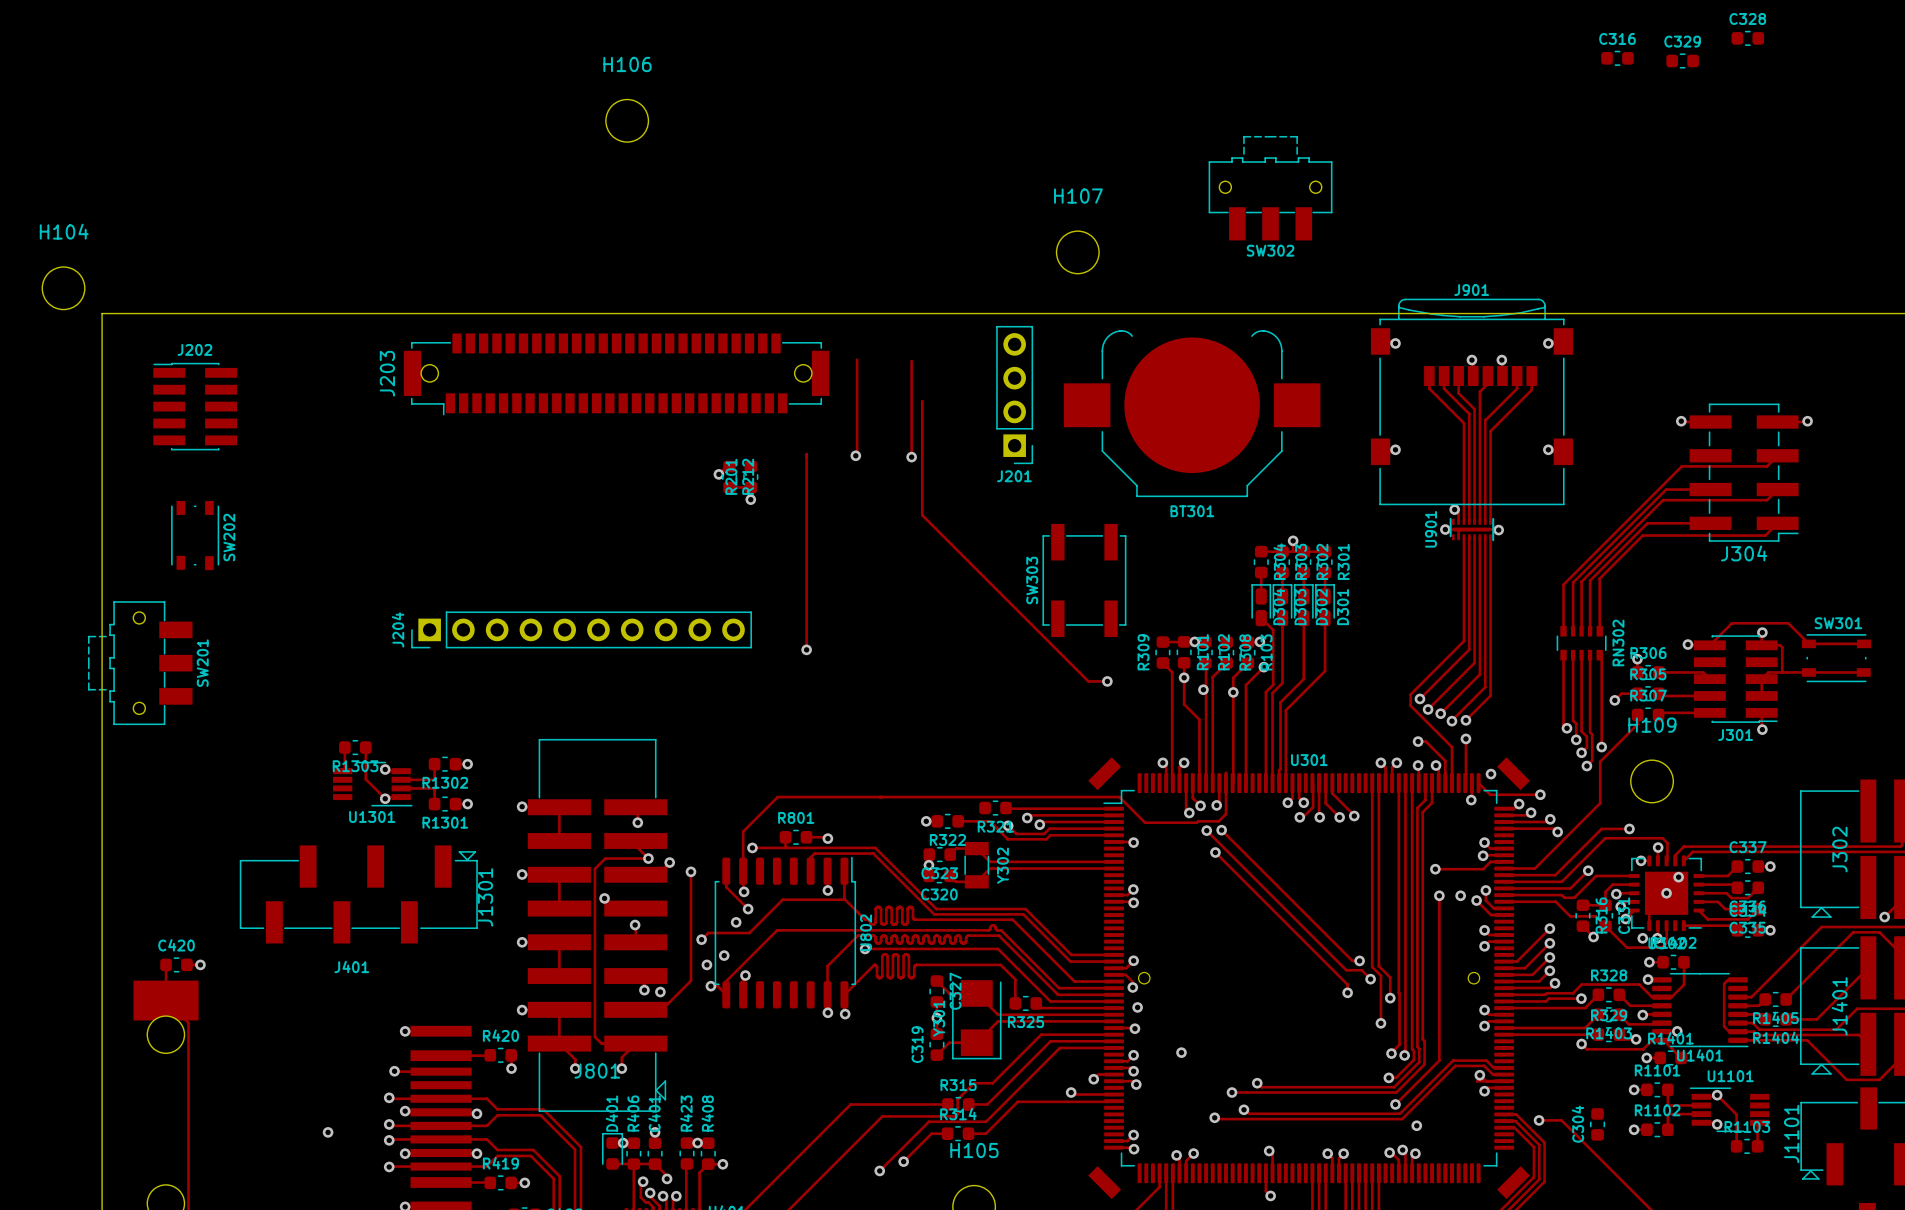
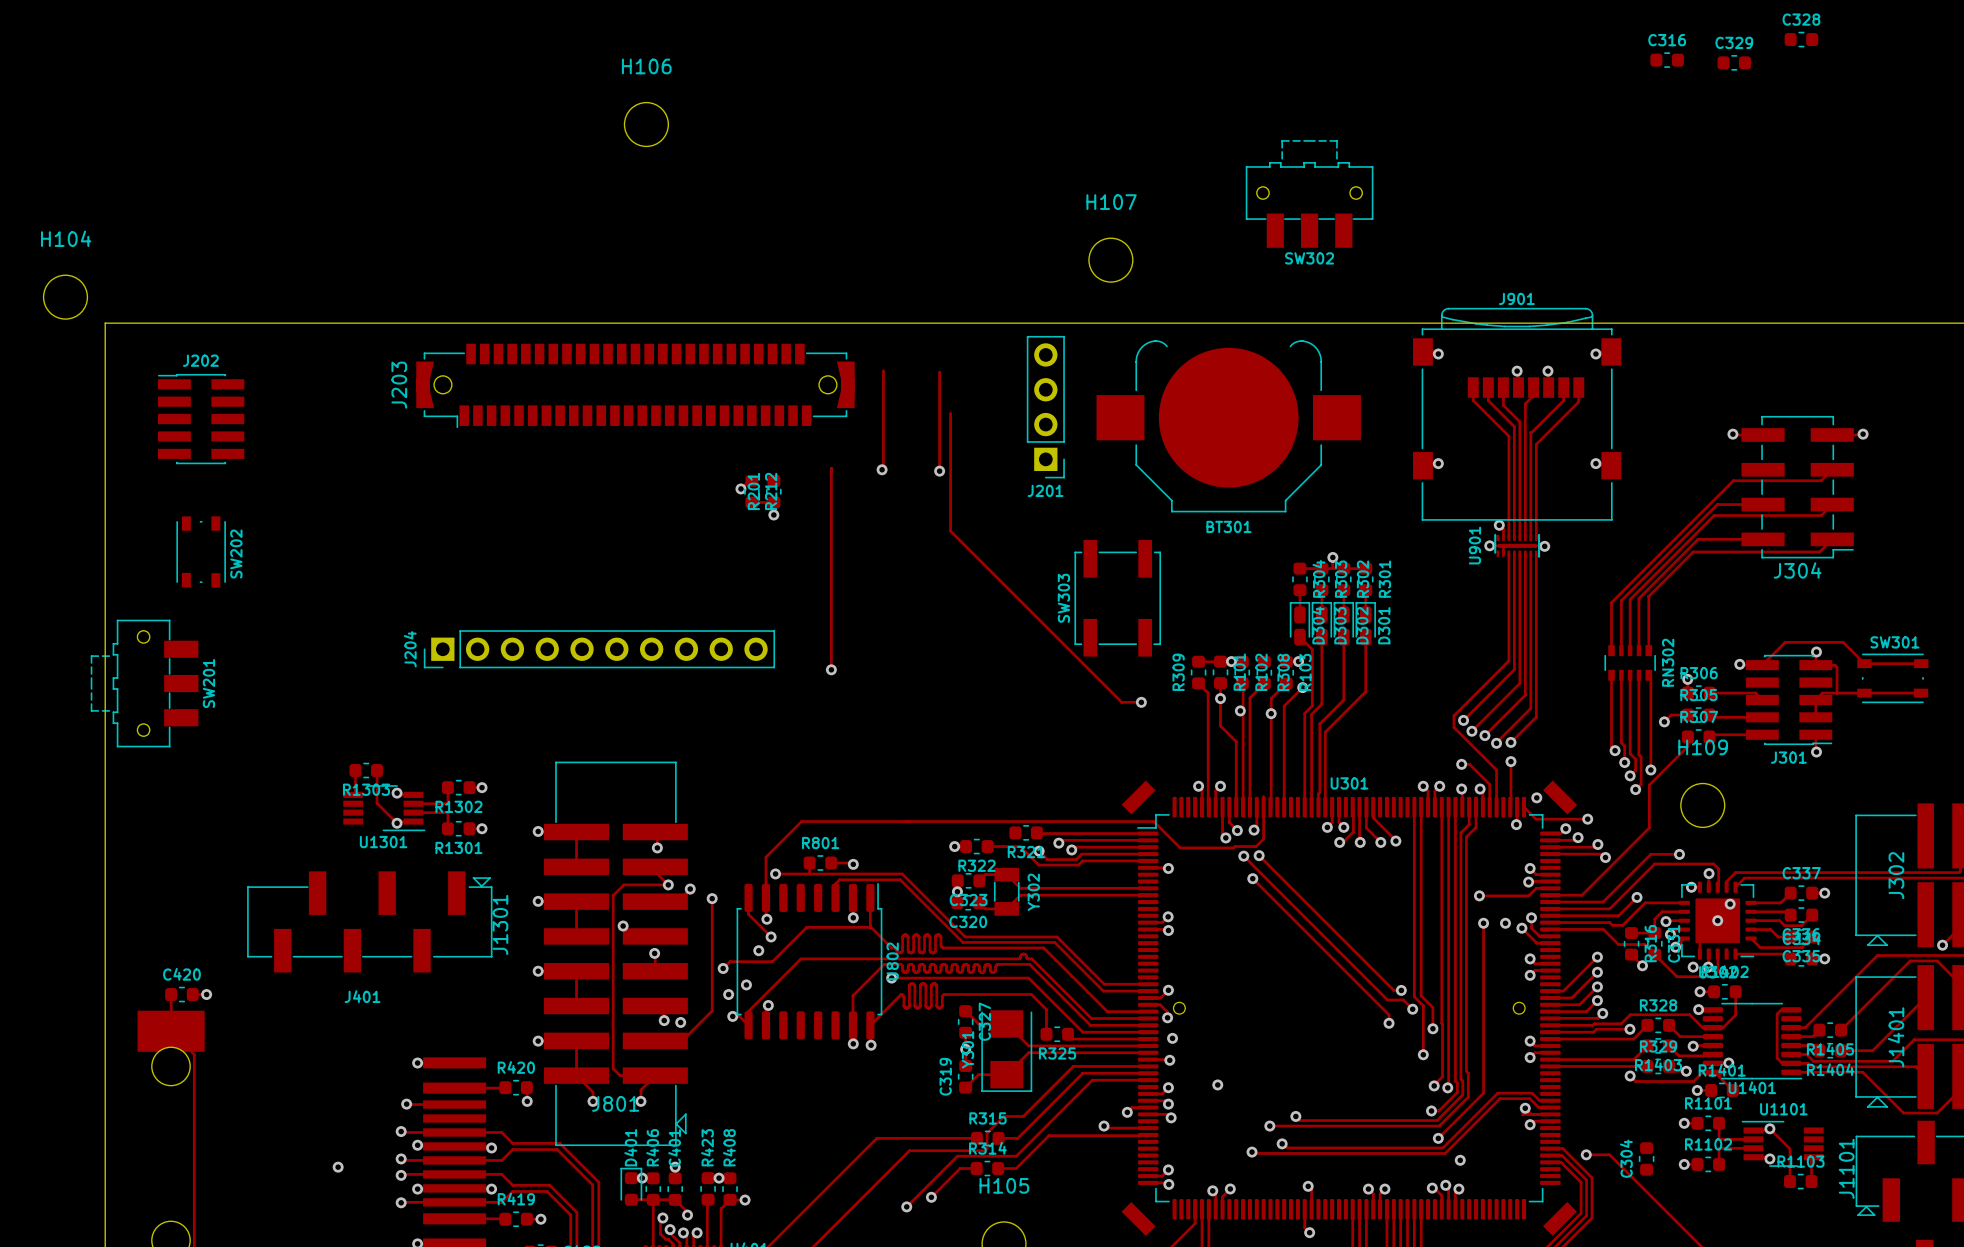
J203 footprint: [403, 333, 830, 416] -> [416, 343, 855, 429]

